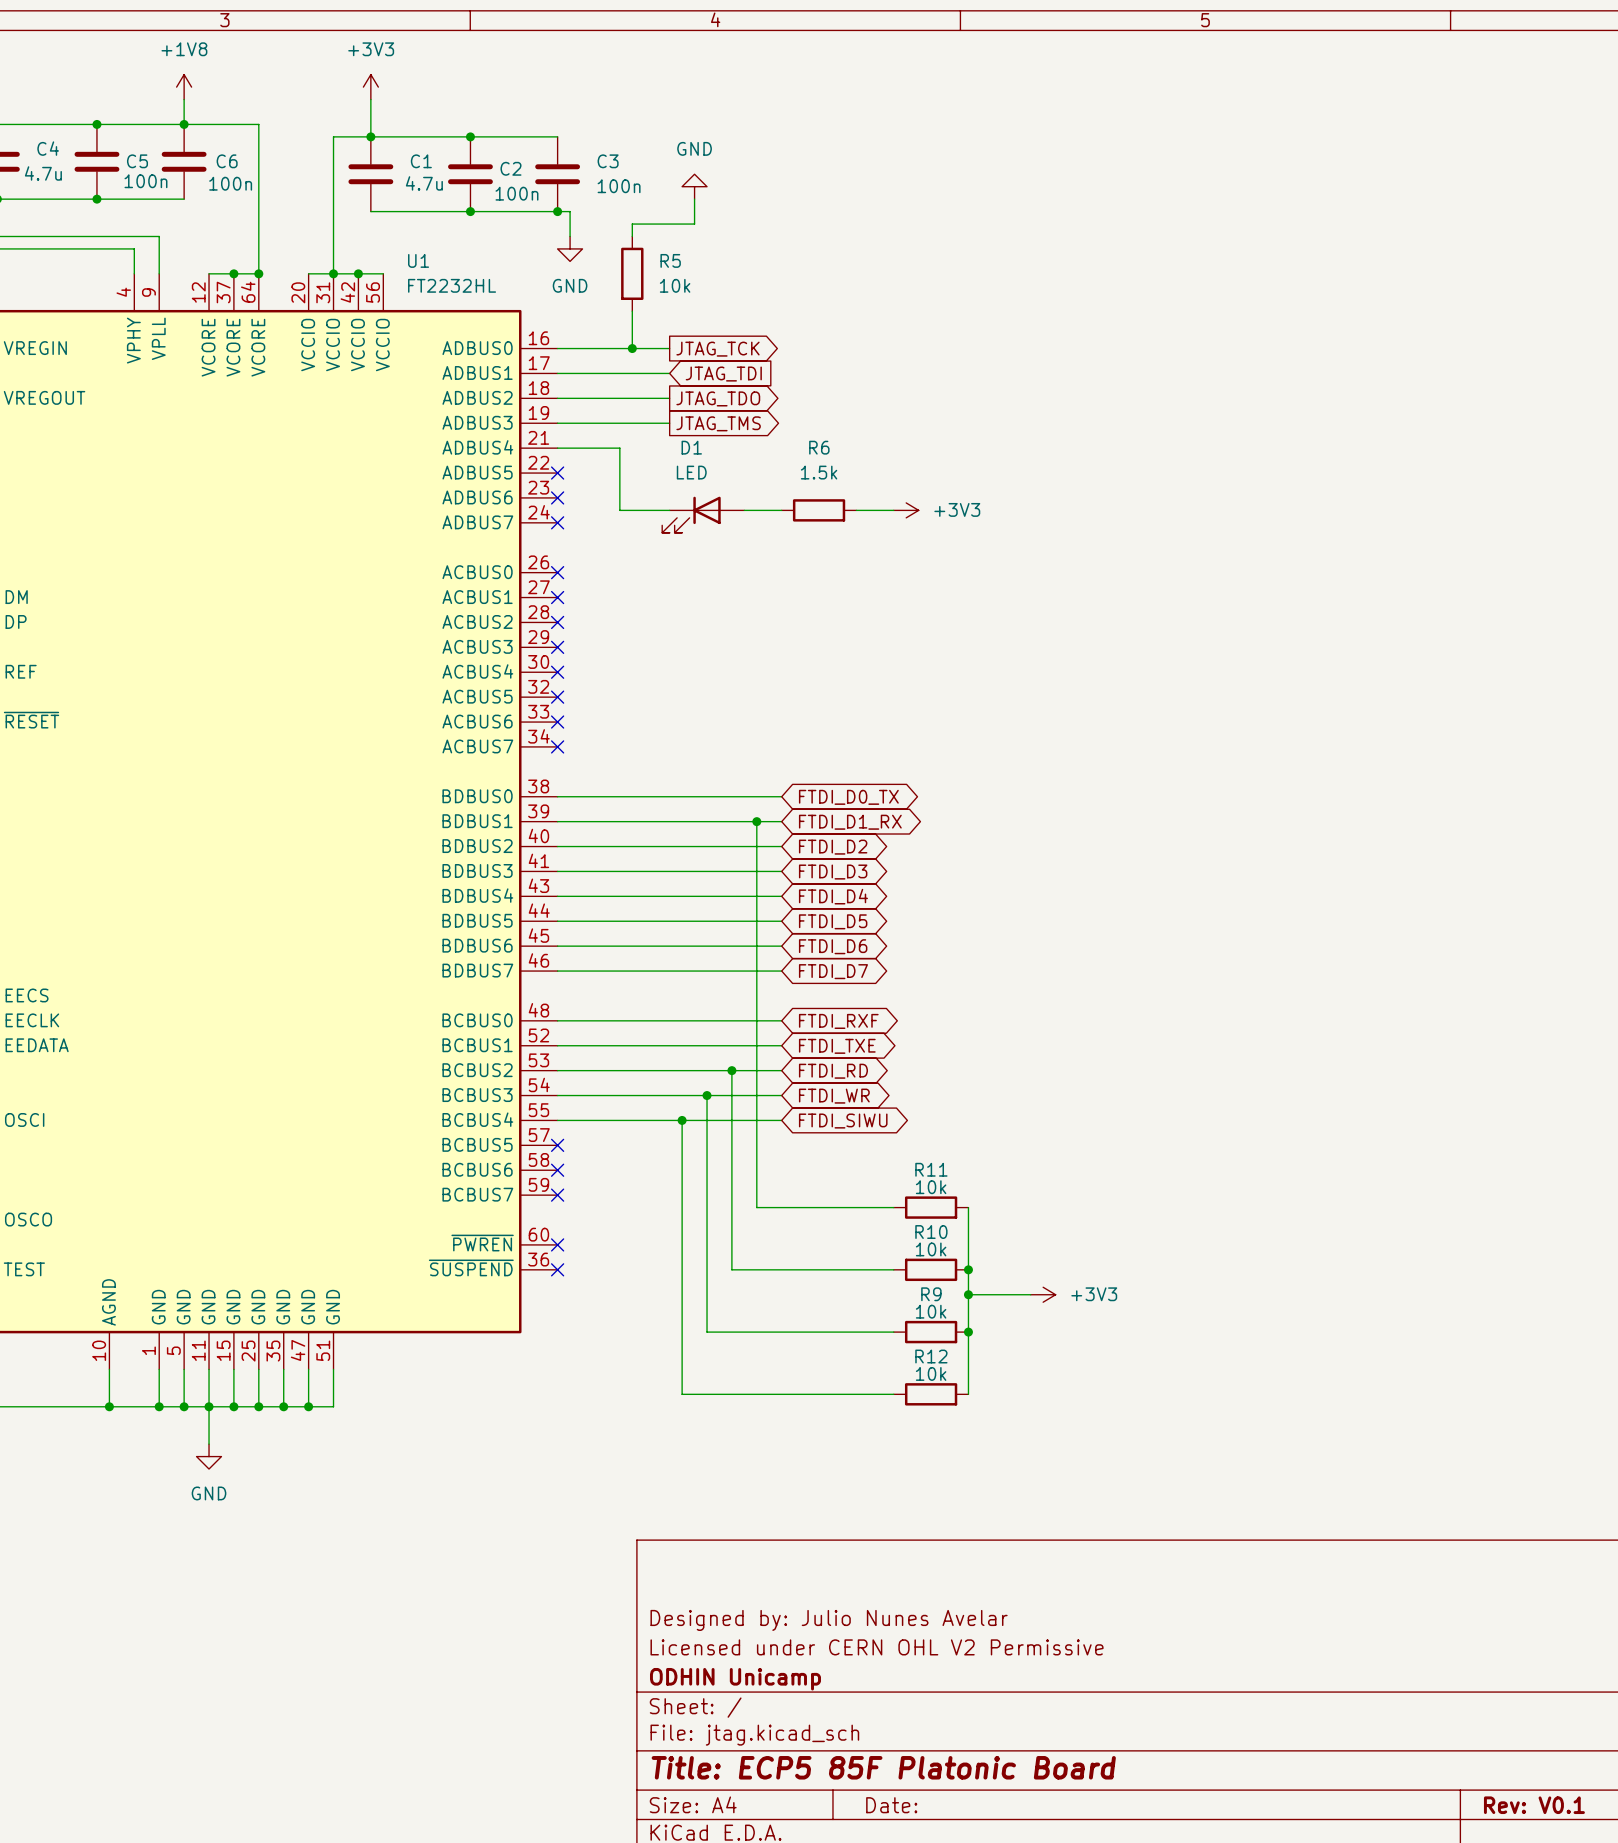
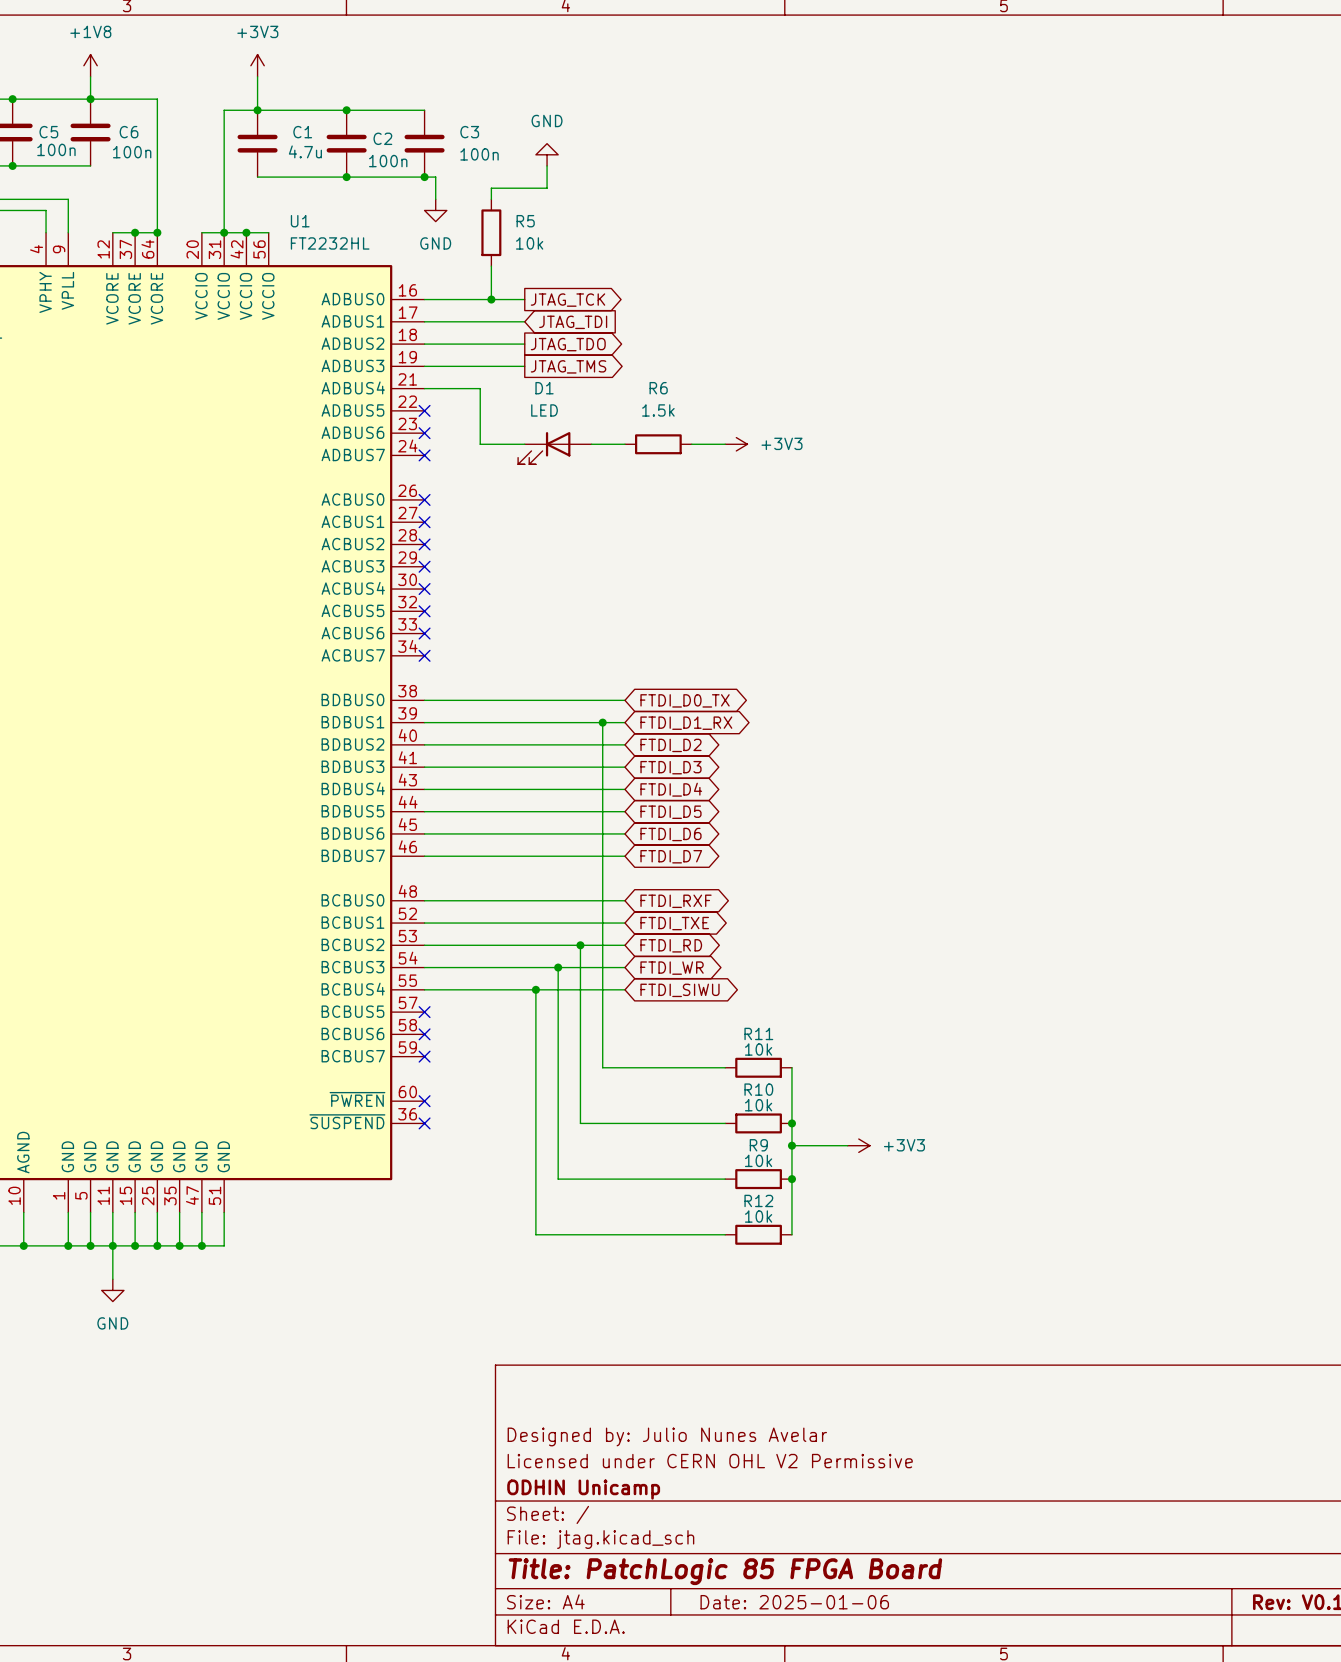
title block: Title: ECP5 85F Platonic Board (883, 1767) -> Title: PatchLogic 85 FPGA Board (725, 1571)
title block: Date: (891, 1805) -> Date: 2025-01-06 (794, 1602)

